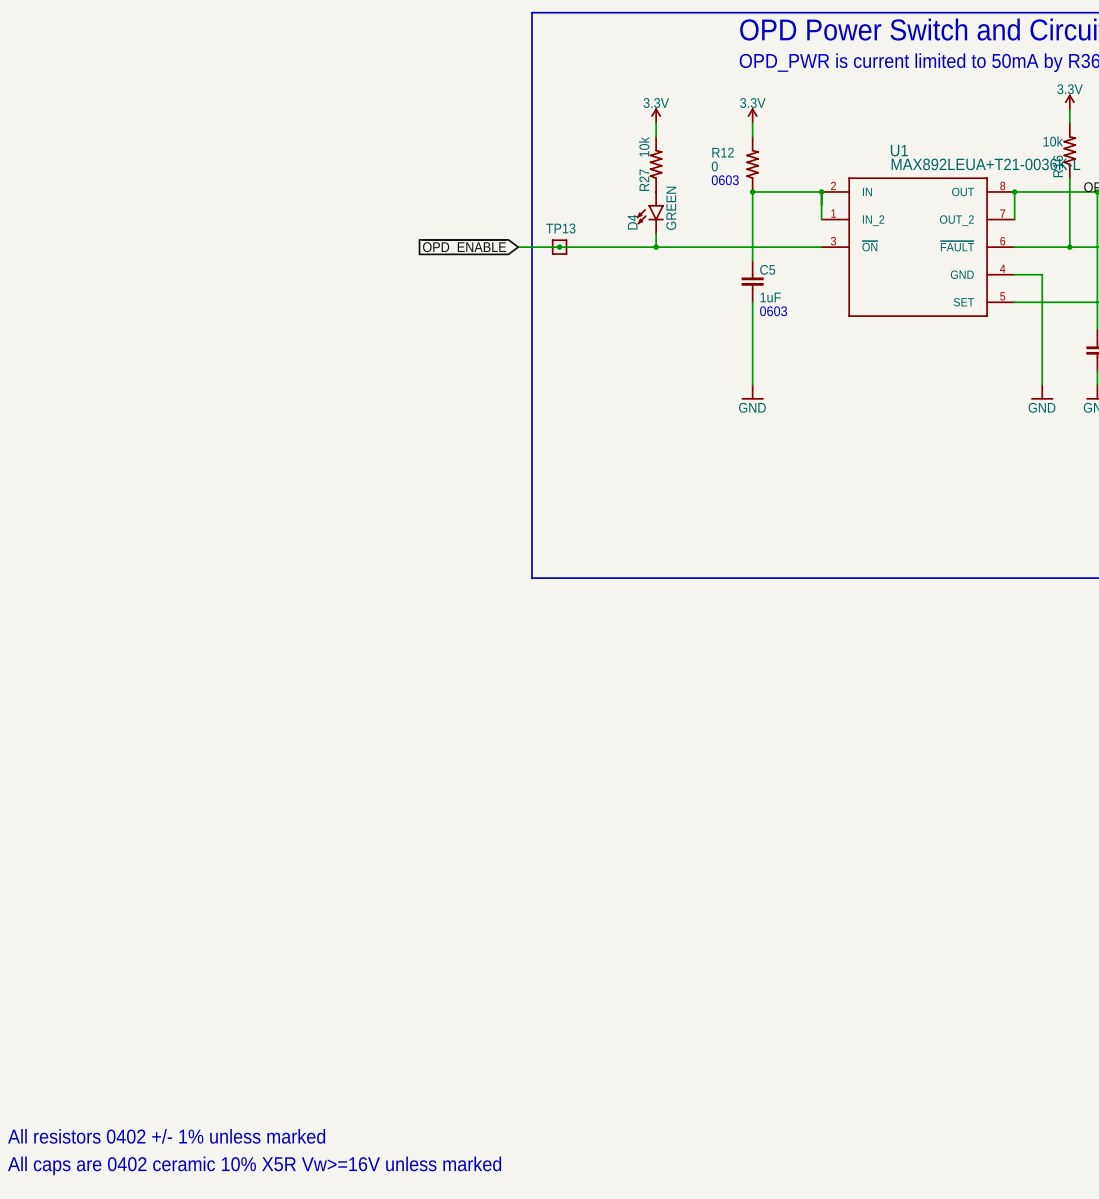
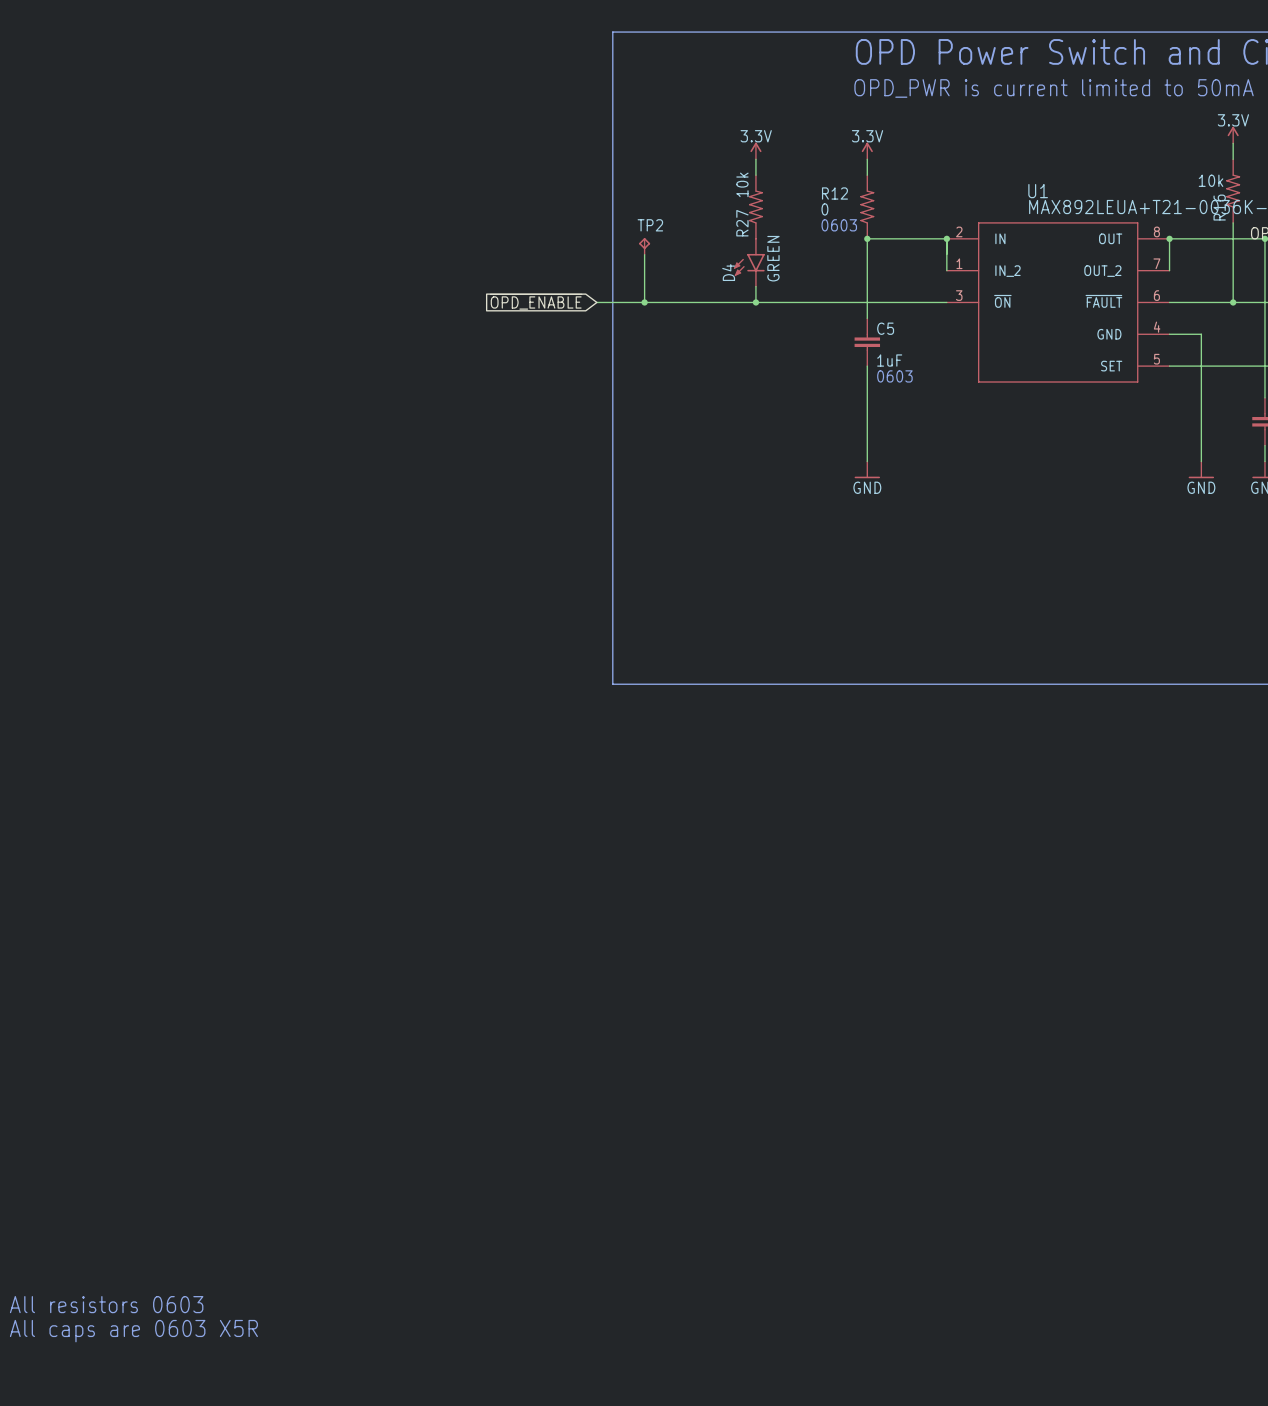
TP2: none -> (644, 246)
wire: none -> (644, 254) (644, 302)
TP13: (559, 247) -> none
text: none -> All resistors 0603 (106, 1304)
text: All resistors 0402 +/- 1% unless marked (166, 1136) -> All caps are 0603 X5R (133, 1331)
text: All caps are 0402 ceramic 10% X5R Vw>=16V unless marked (254, 1165) -> none

